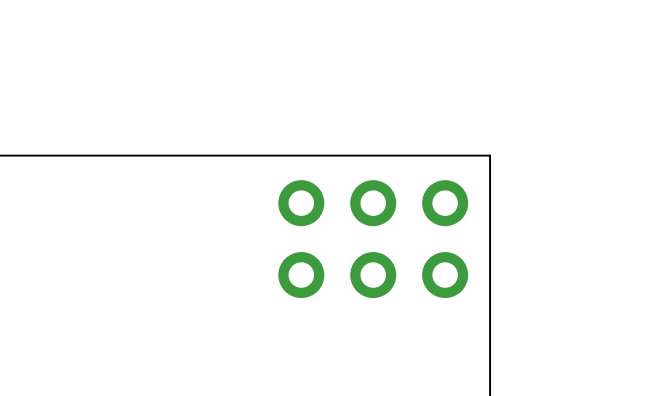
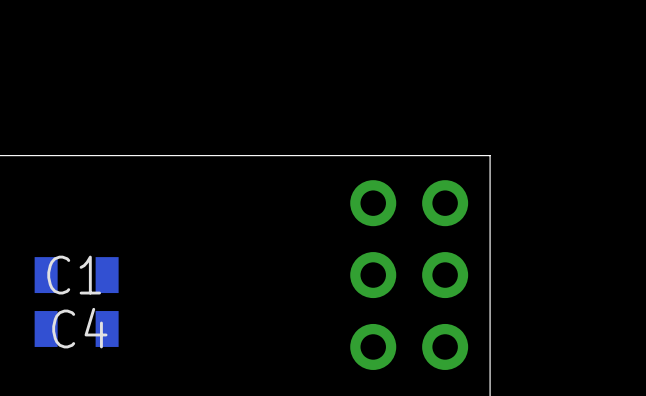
part rotation: 0° (373, 239) -> 90° clockwise (409, 275)
C4: none -> (76, 275)
C1: none -> (76, 328)

